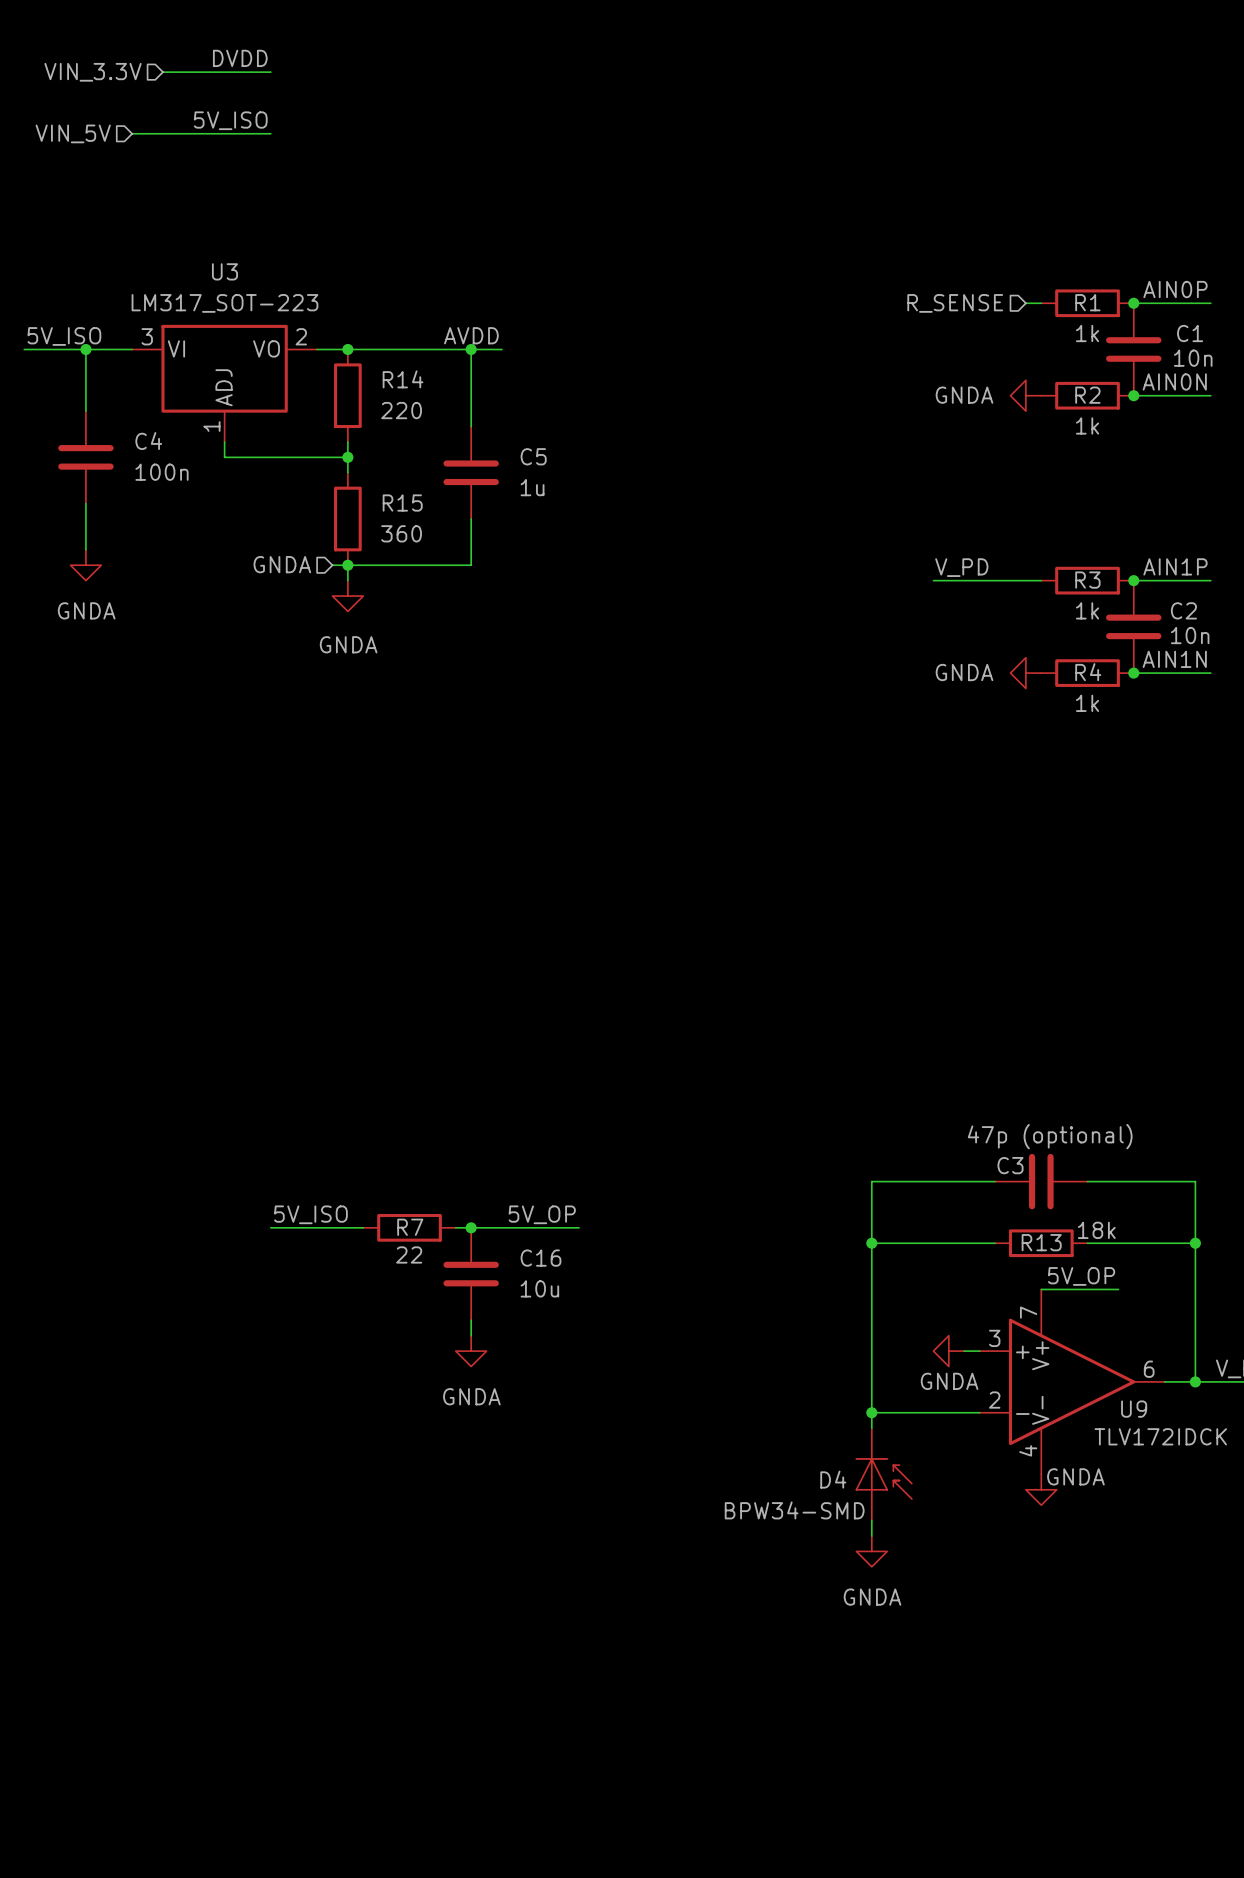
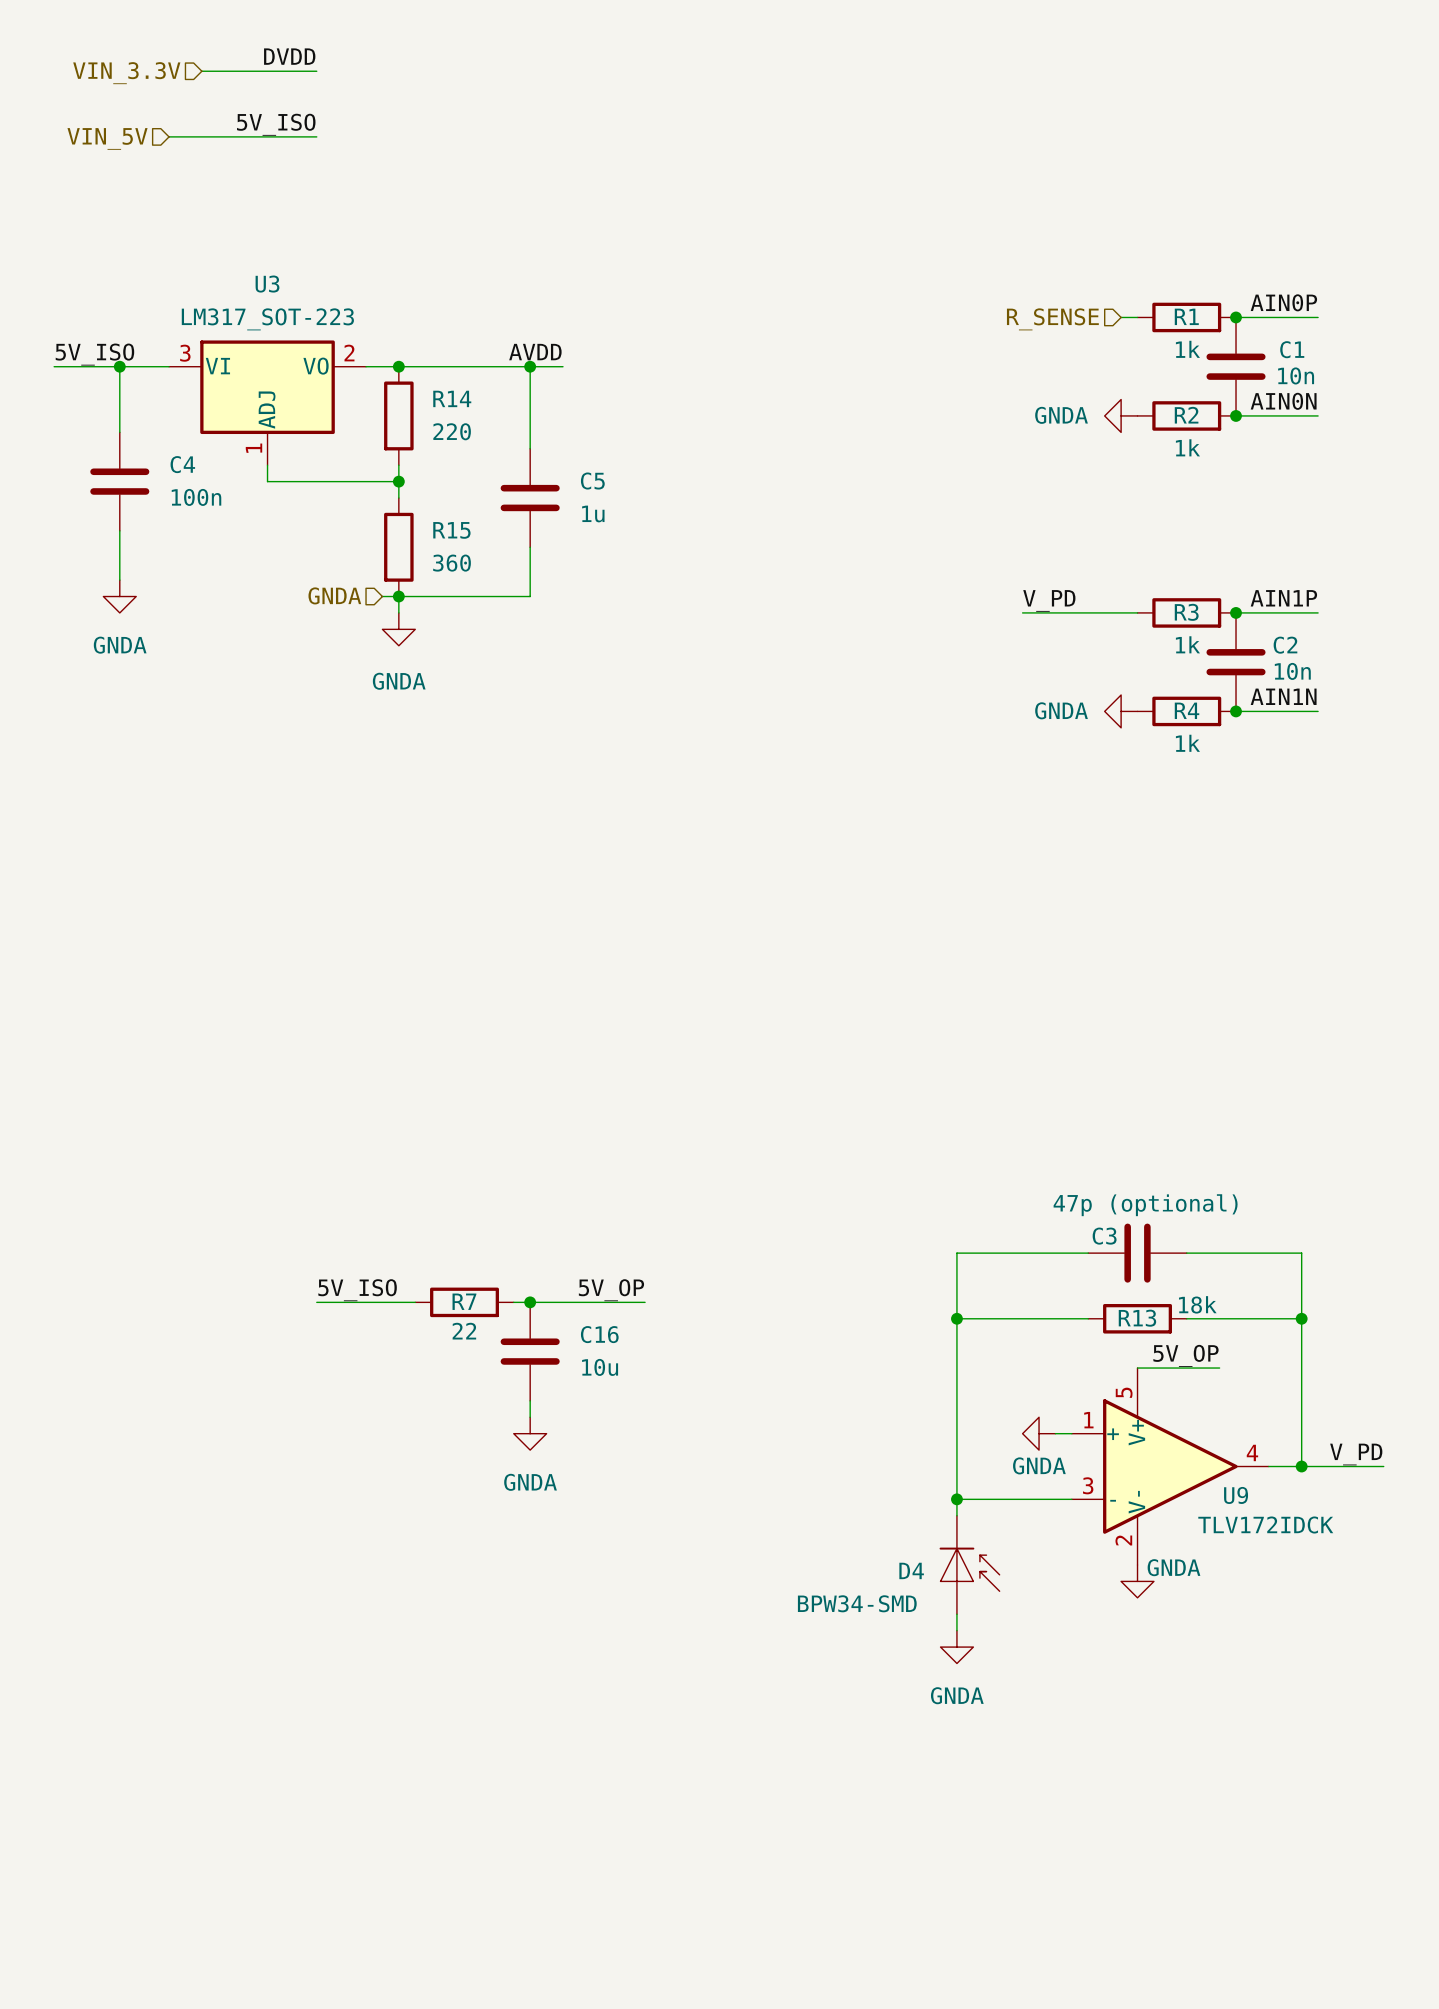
U9 pin number: 7 (1028, 1312) -> 5 (1124, 1392)
U9 pin number: 3 (994, 1338) -> 1 (1088, 1420)
U9 pin number: 6 (1149, 1369) -> 4 (1252, 1452)
U9 pin number: 2 (994, 1400) -> 3 (1088, 1485)
U9 pin number: 4 (1028, 1450) -> 2 (1123, 1540)

